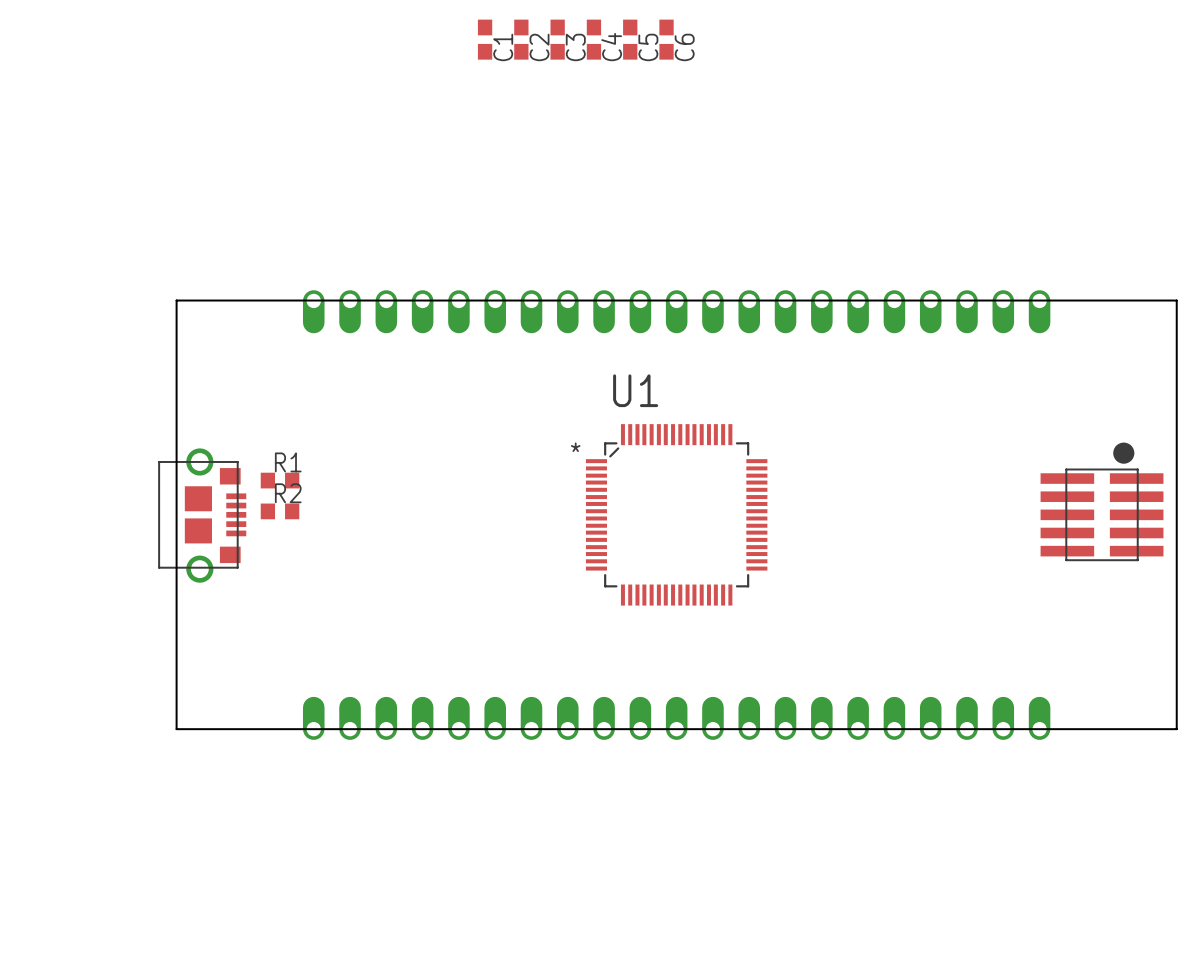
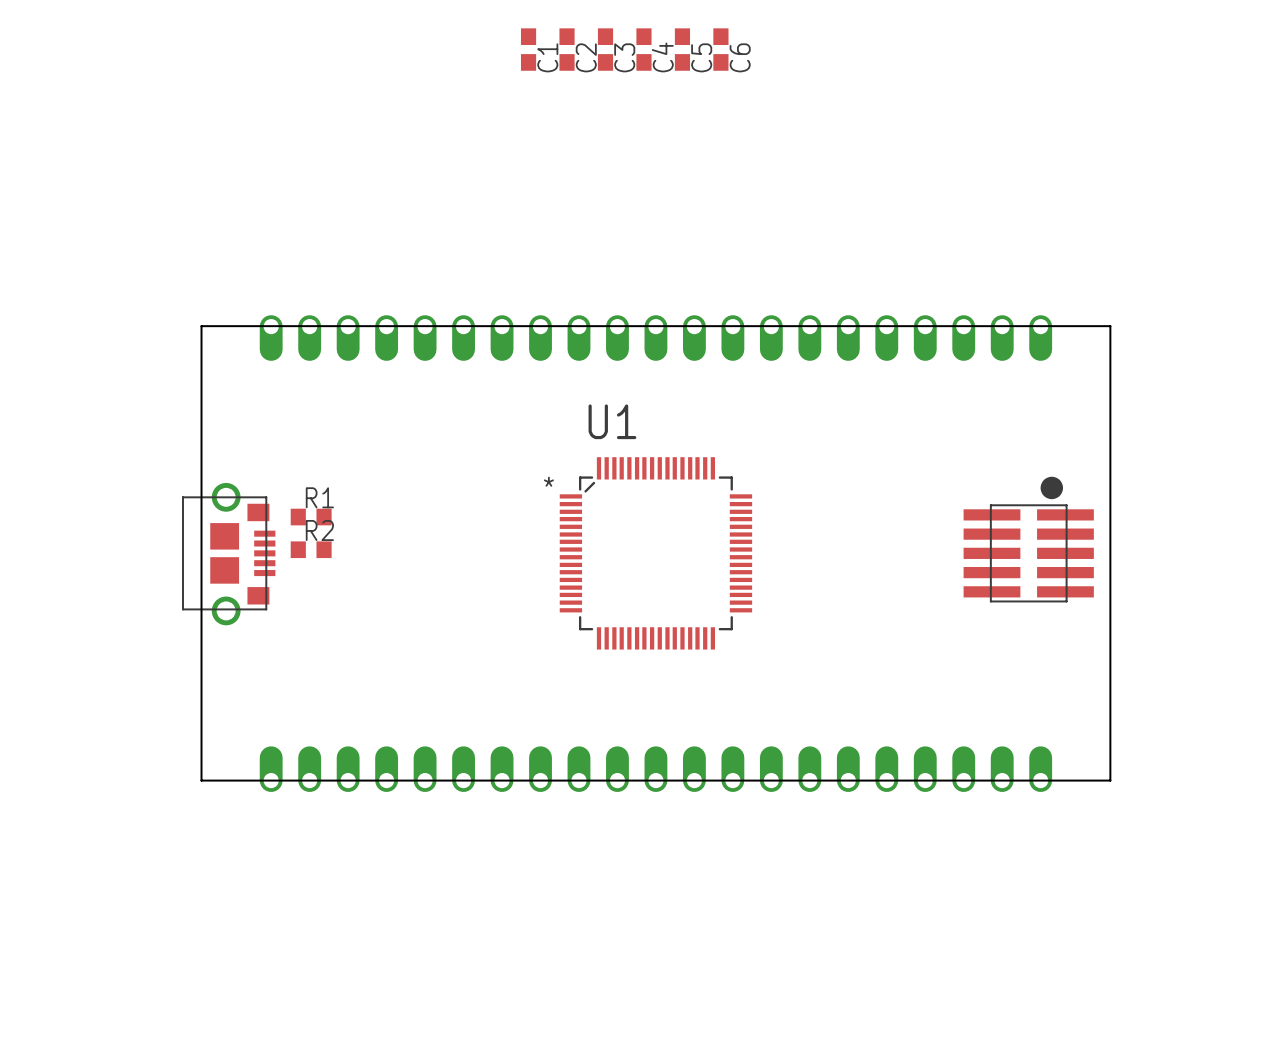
board edge: (1033, 300) (1176, 300) (1176, 729) (1033, 729) -> (1110, 326) (1110, 780)
part position: (676, 311) -> (655, 338)
part position: (1102, 501) -> (1028, 539)
U1 position: (676, 514) -> (655, 553)
part position: (676, 718) -> (655, 769)

